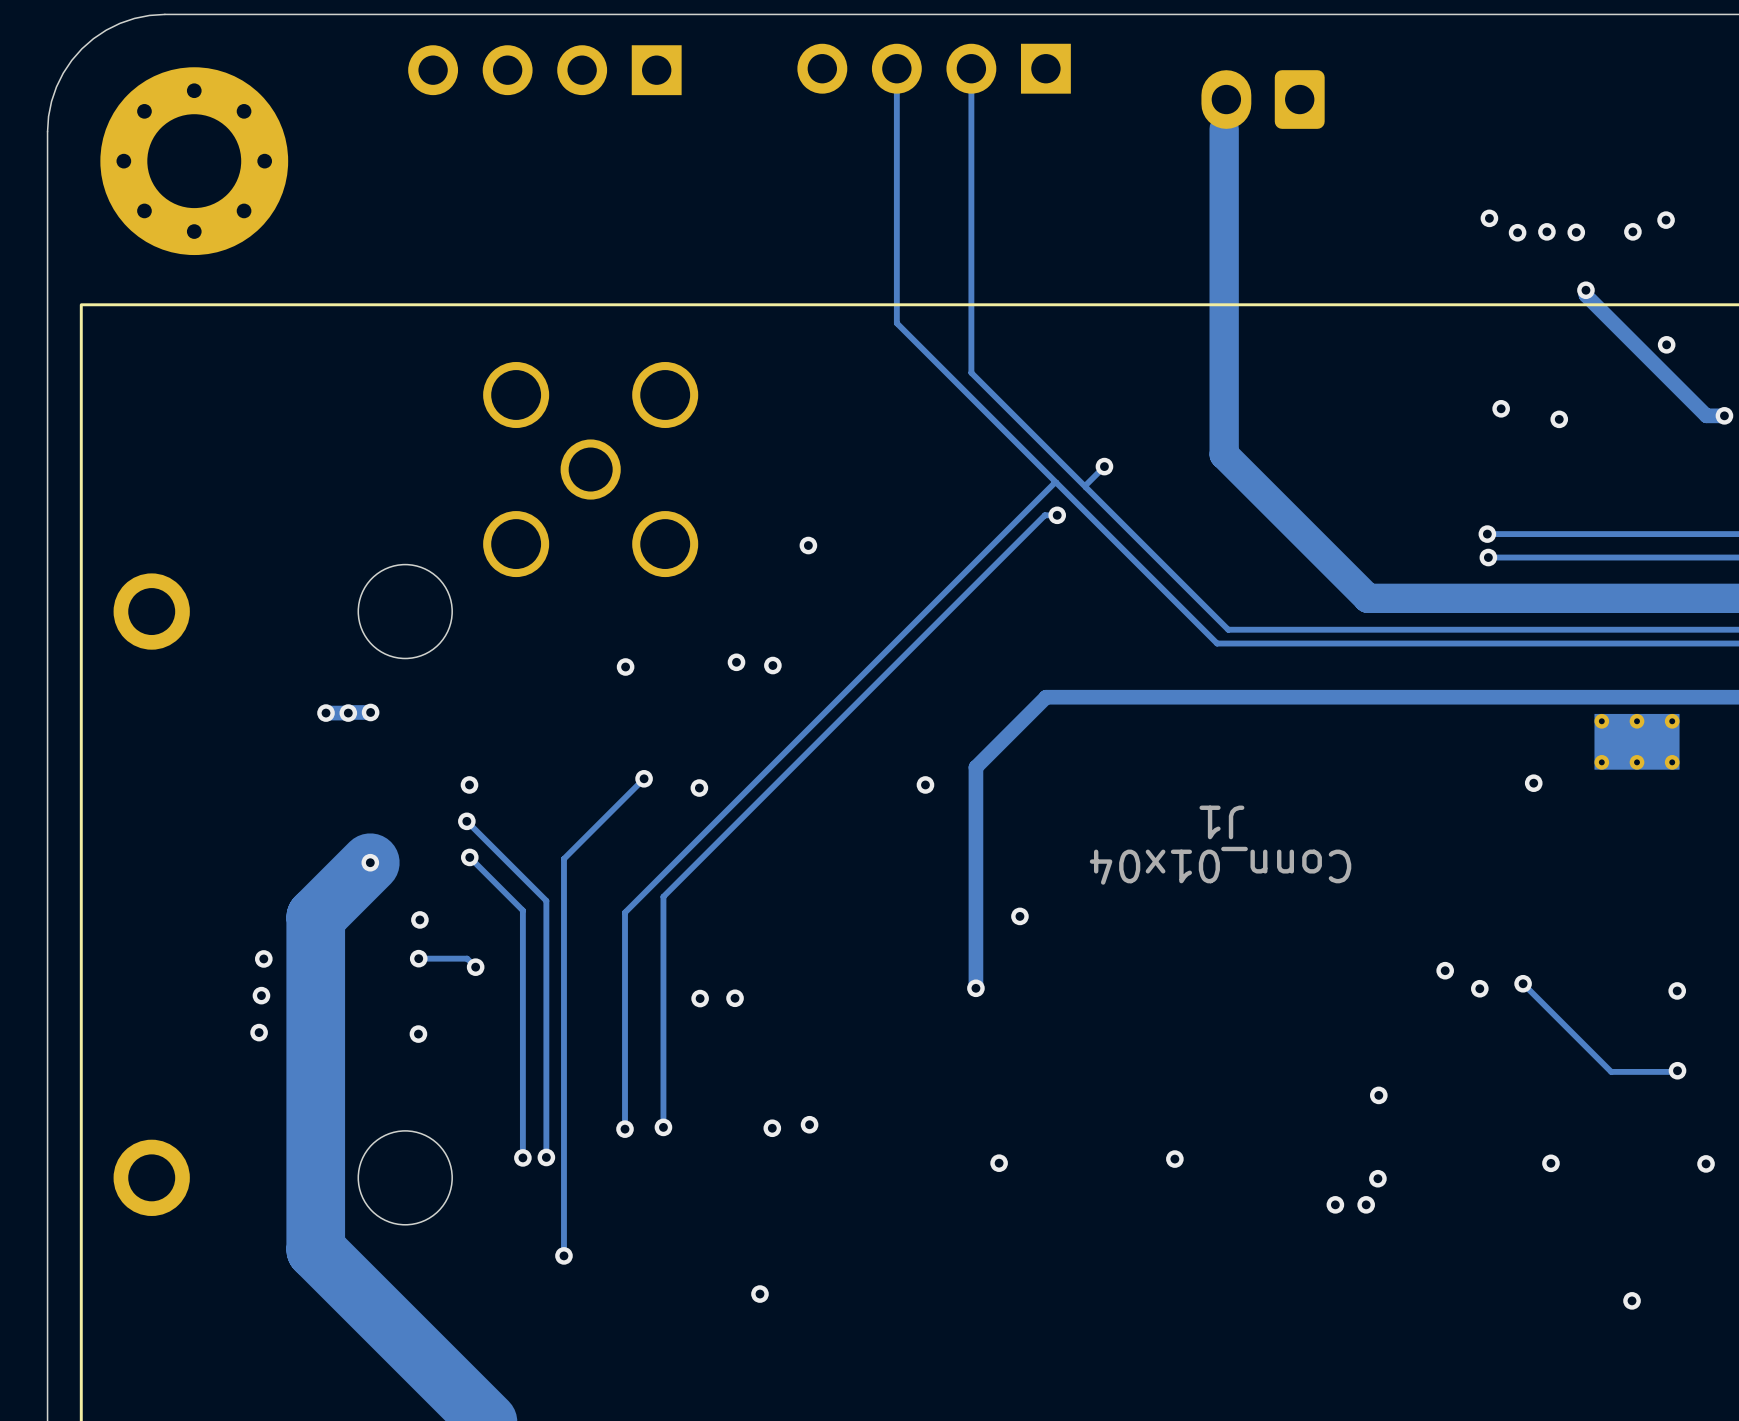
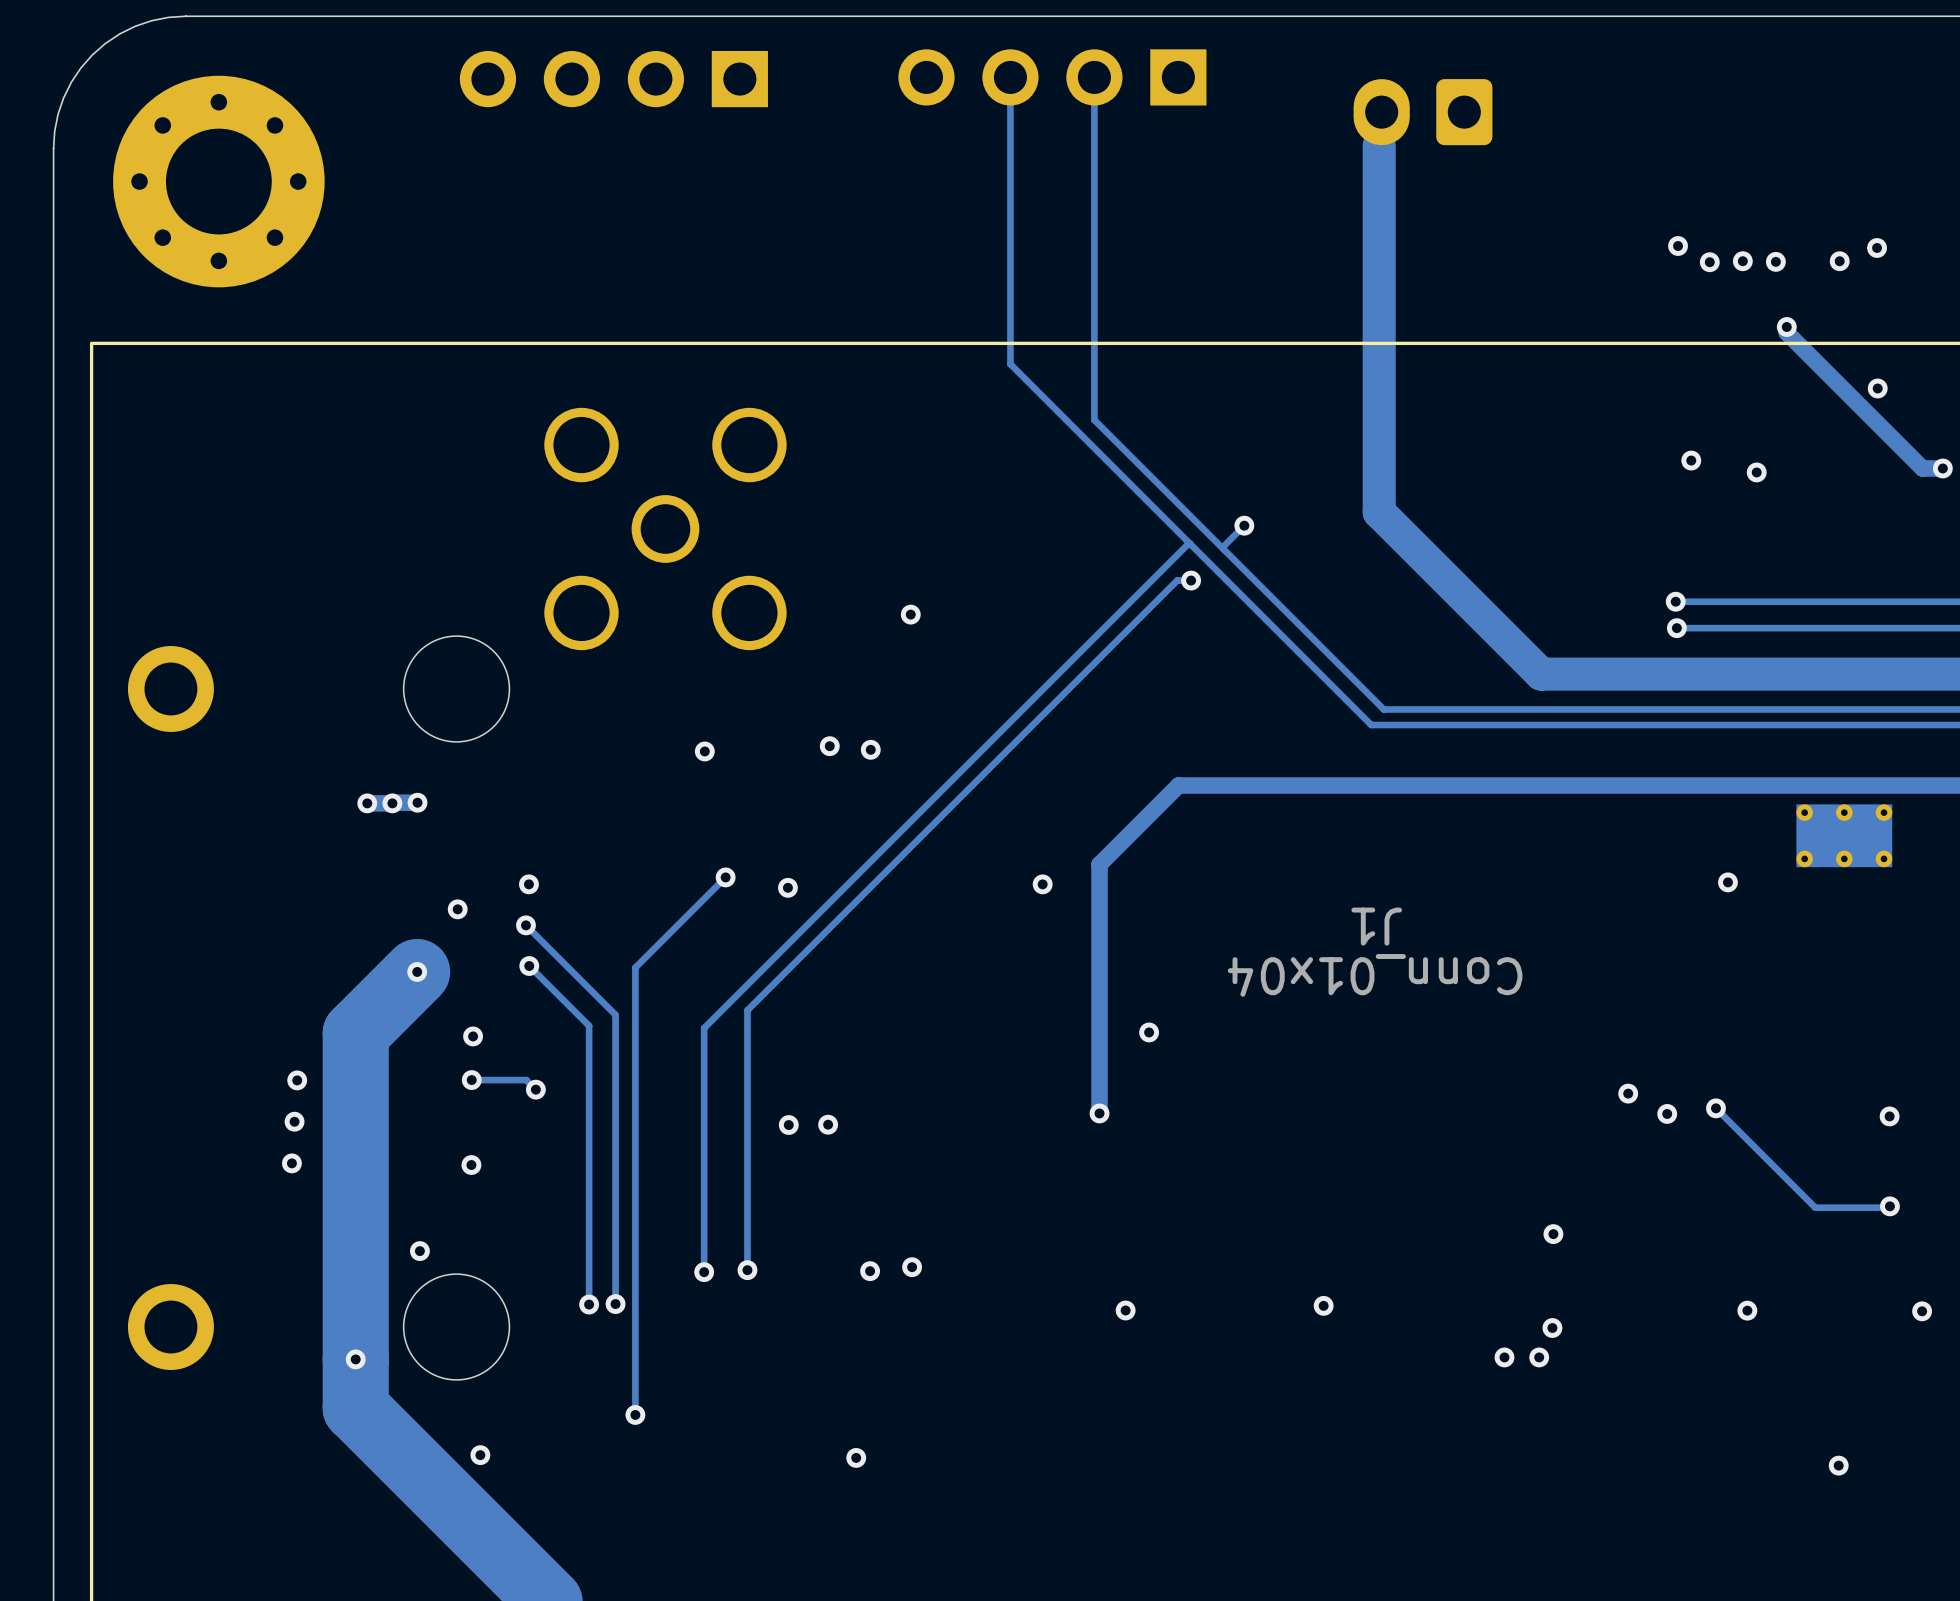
via: none -> (457, 909)
via: none -> (419, 1251)
via: none -> (355, 1359)
via: none -> (480, 1455)

